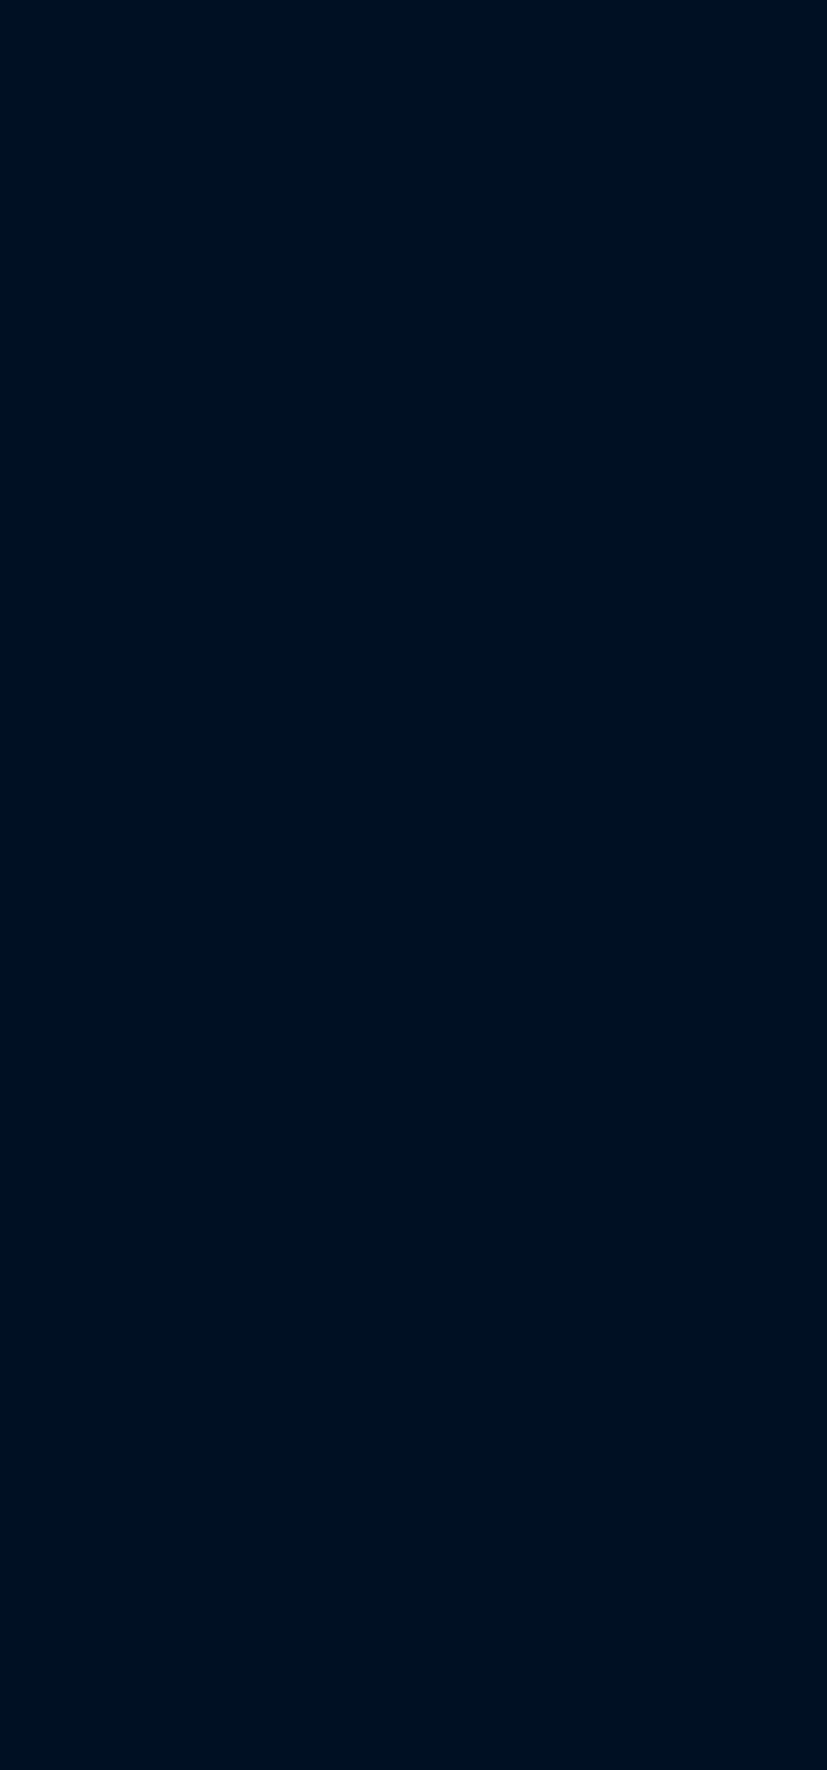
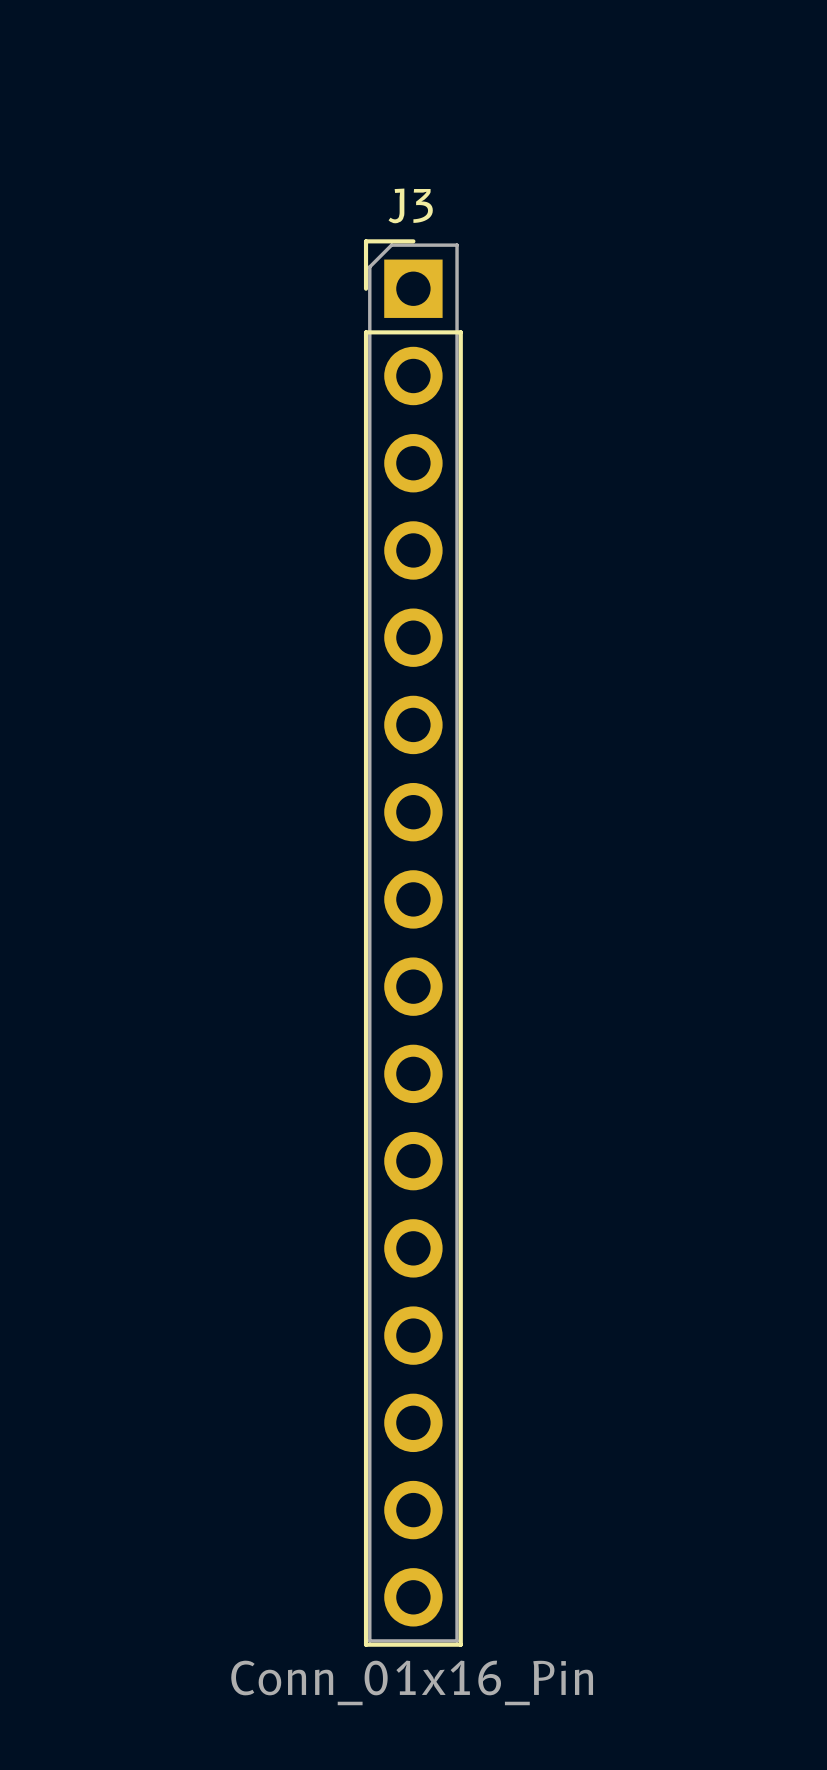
J3: none -> Conn_01x16_Pin (413, 943)

